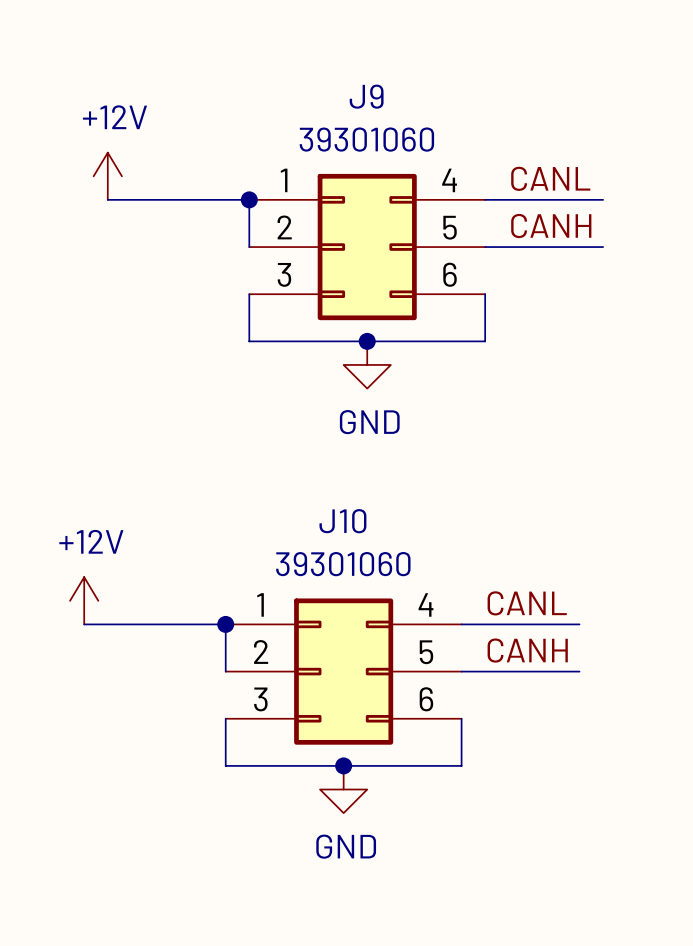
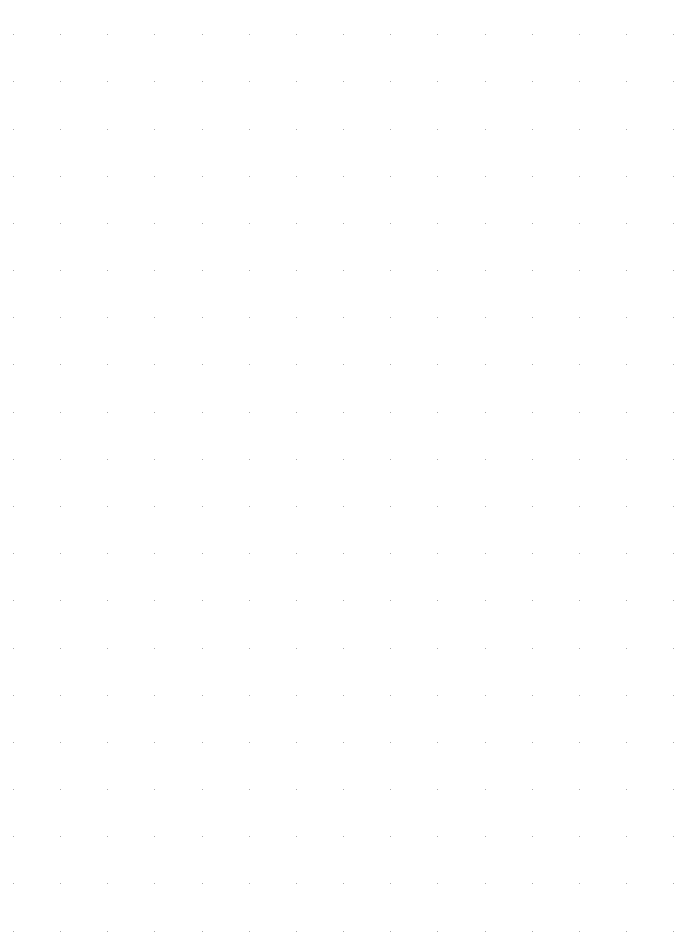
power symbol: +12V (107, 176) -> none
label: CANL (550, 178) -> none
wire: (107, 199) (249, 199) (249, 247) -> none
junction: (249, 199) -> none
wire: (485, 199) (603, 199) -> none
label: CANH (551, 226) -> none
J9: 39301060 (367, 247) -> none
wire: (485, 247) (603, 247) -> none
wire: (249, 294) (249, 341) (485, 341) (485, 294) -> none
junction: (367, 341) -> none
power symbol: GND (367, 364) -> none
power symbol: +12V (84, 600) -> none
label: CANL (527, 603) -> none
wire: (84, 624) (225, 624) (225, 671) -> none
junction: (225, 624) -> none
wire: (461, 624) (579, 624) -> none
label: CANH (527, 650) -> none
J10: 39301060 (343, 671) -> none
wire: (461, 671) (579, 671) -> none
wire: (225, 718) (225, 765) (461, 765) (461, 718) -> none
junction: (343, 765) -> none
power symbol: GND (343, 789) -> none

